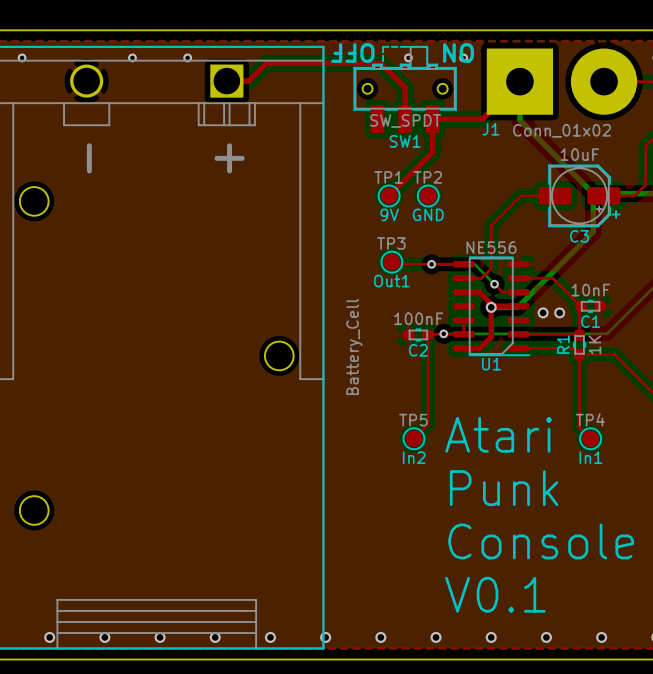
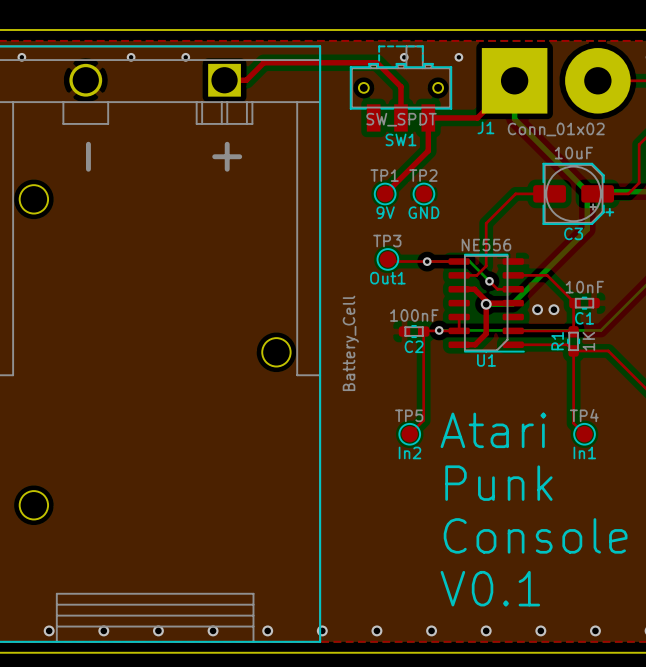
text: OFF (352, 53) -> none
text: ON (458, 53) -> none

